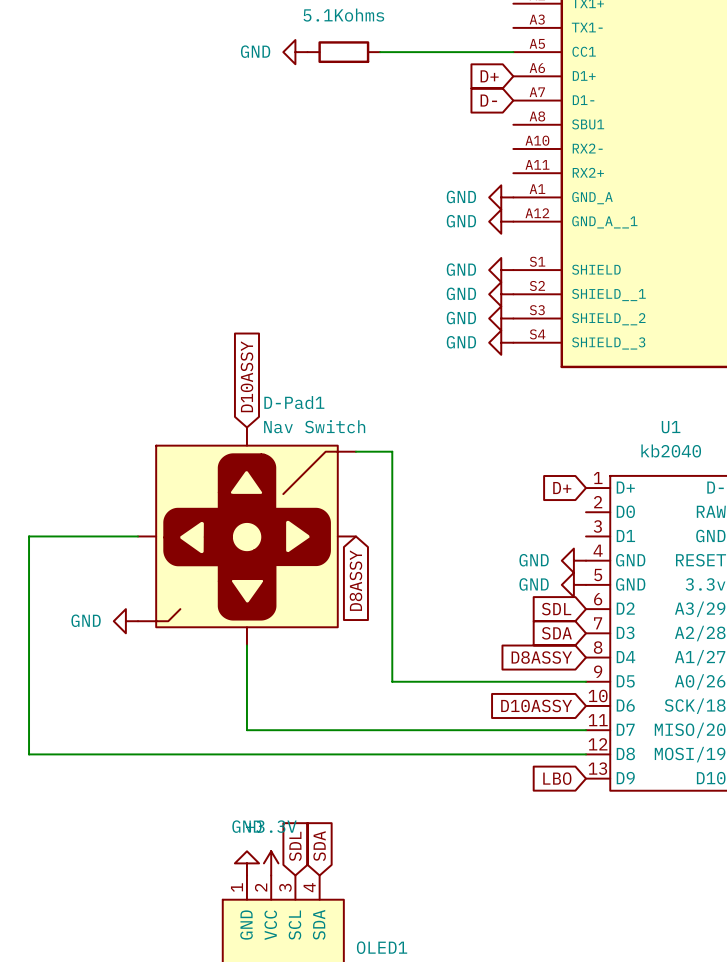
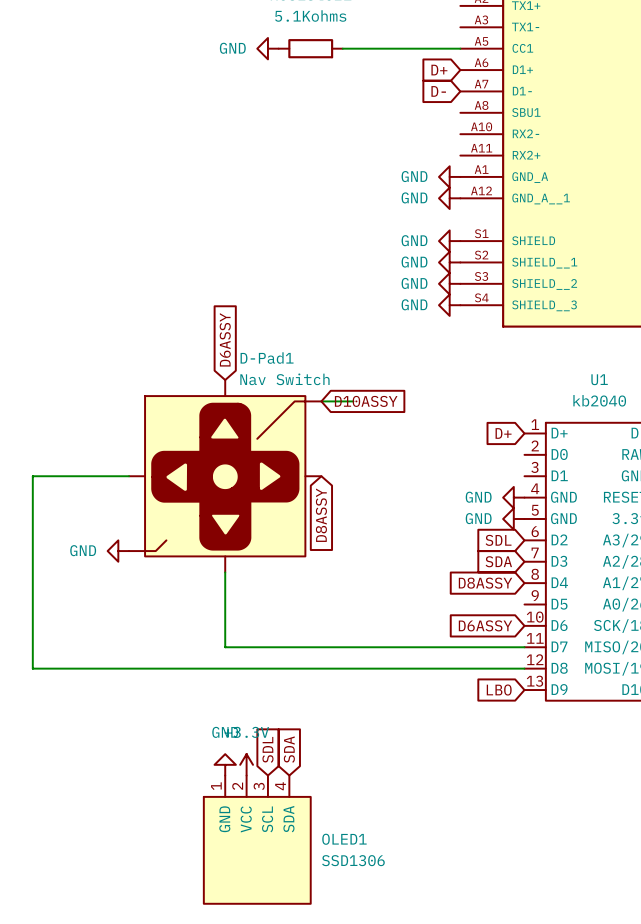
global label: D10ASSY (246, 376) -> D6ASSY (225, 339)
wire: (392, 451) (392, 681) (586, 681) -> none
global label: none -> D10ASSY (366, 401)
global label: D10ASSY (536, 705) -> D6ASSY (485, 625)

